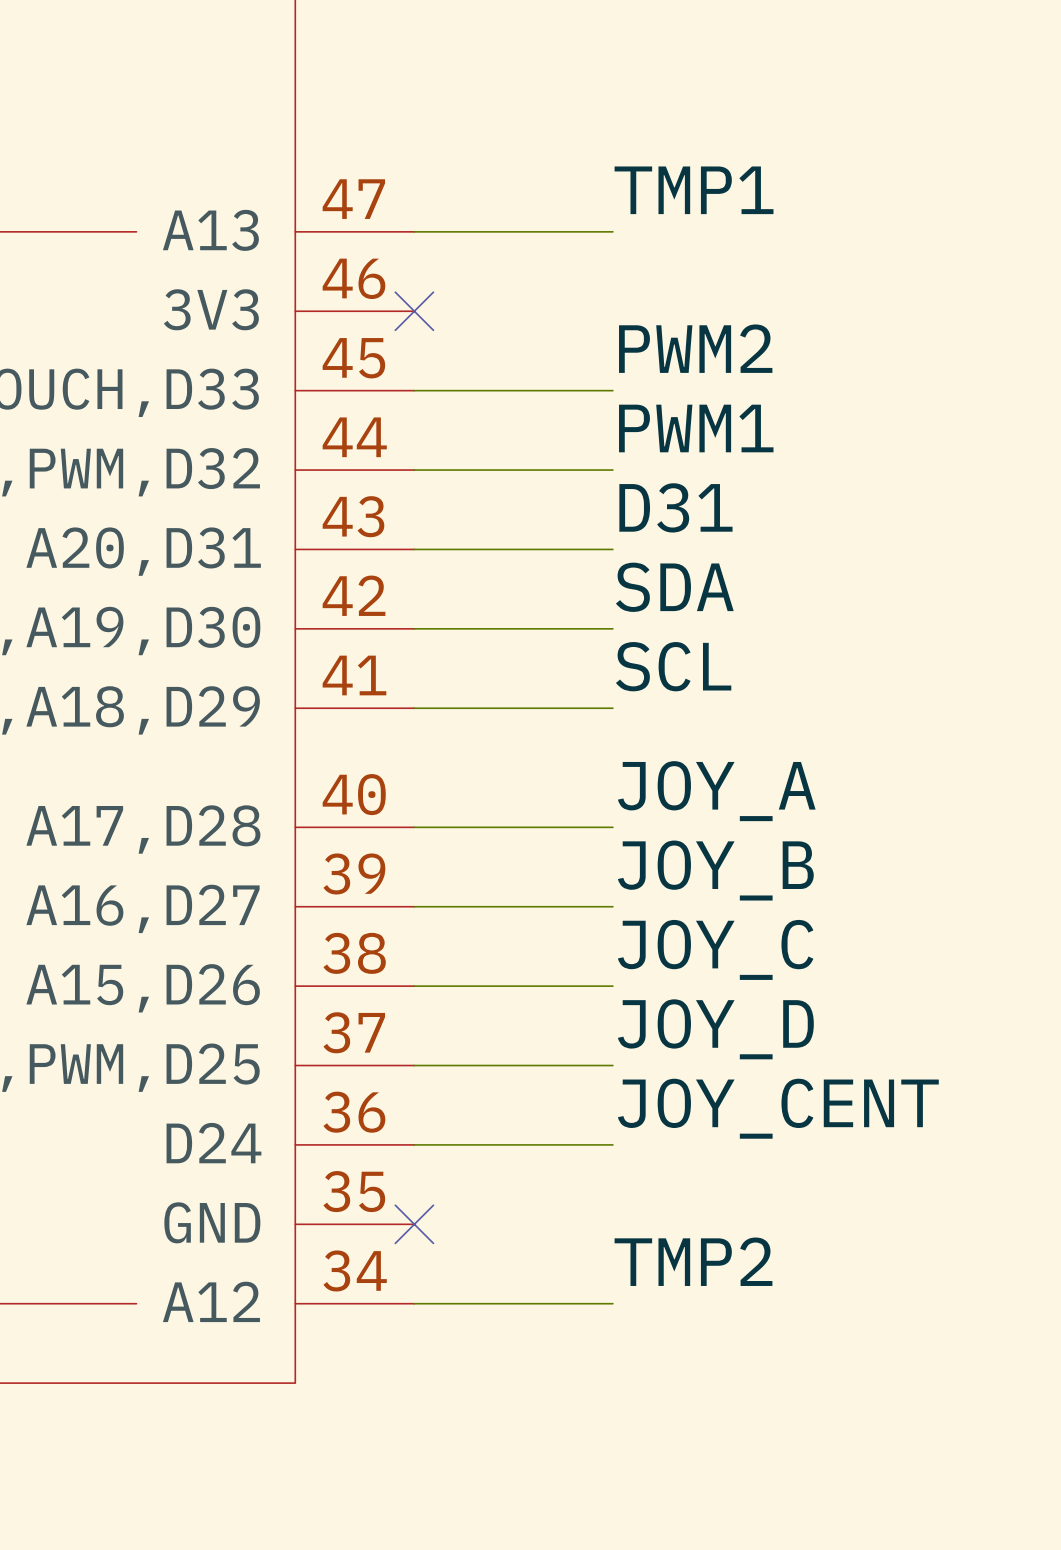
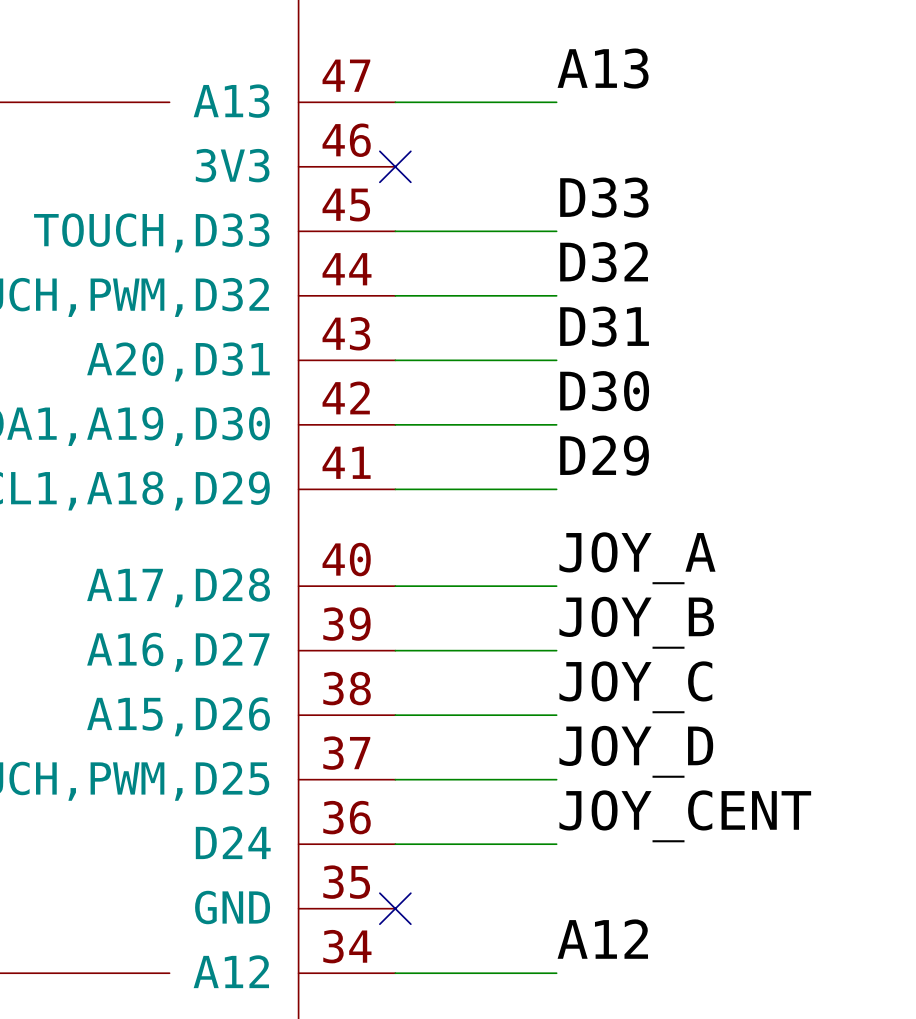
label: TMP1 (694, 190) -> A13 (603, 68)
label: PWM2 (695, 348) -> D33 (604, 197)
label: PWM1 (696, 428) -> D32 (604, 262)
label: SDA (674, 587) -> D30 (604, 391)
label: SCL (673, 666) -> D29 (604, 455)
label: TMP2 (693, 1261) -> A12 (602, 939)

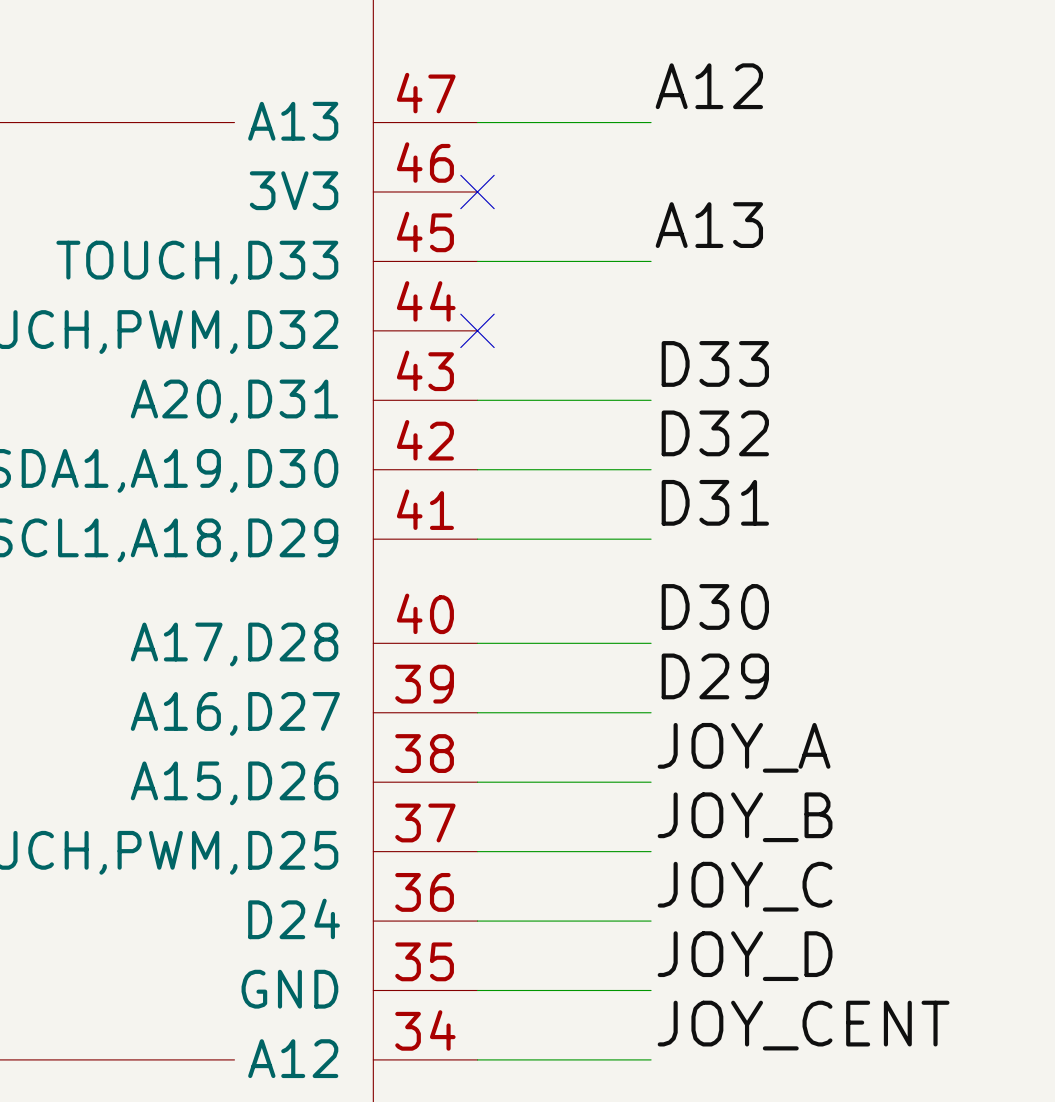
label: A13 (603, 68) -> A12 (709, 86)
label: D33 (604, 197) -> A13 (709, 225)
label: D32 (604, 262) -> none
wire: (395, 295) (556, 295) -> (477, 990) (651, 990)
no-connect mark: none -> (477, 330)
label: D31 (604, 326) -> D33 (715, 363)
label: D30 (604, 391) -> D32 (715, 433)
label: D29 (604, 455) -> D31 (715, 502)
label: JOY_A (637, 558) -> D30 (715, 606)
label: JOY_B (636, 622) -> D29 (715, 676)
label: JOY_C (635, 687) -> JOY_A (744, 747)
label: JOY_D (636, 751) -> JOY_B (745, 817)
label: JOY_CENT (685, 816) -> JOY_C (745, 886)
label: none -> JOY_D (745, 956)
no-connect mark: (395, 908) -> none
label: A12 (602, 939) -> JOY_CENT (803, 1025)

